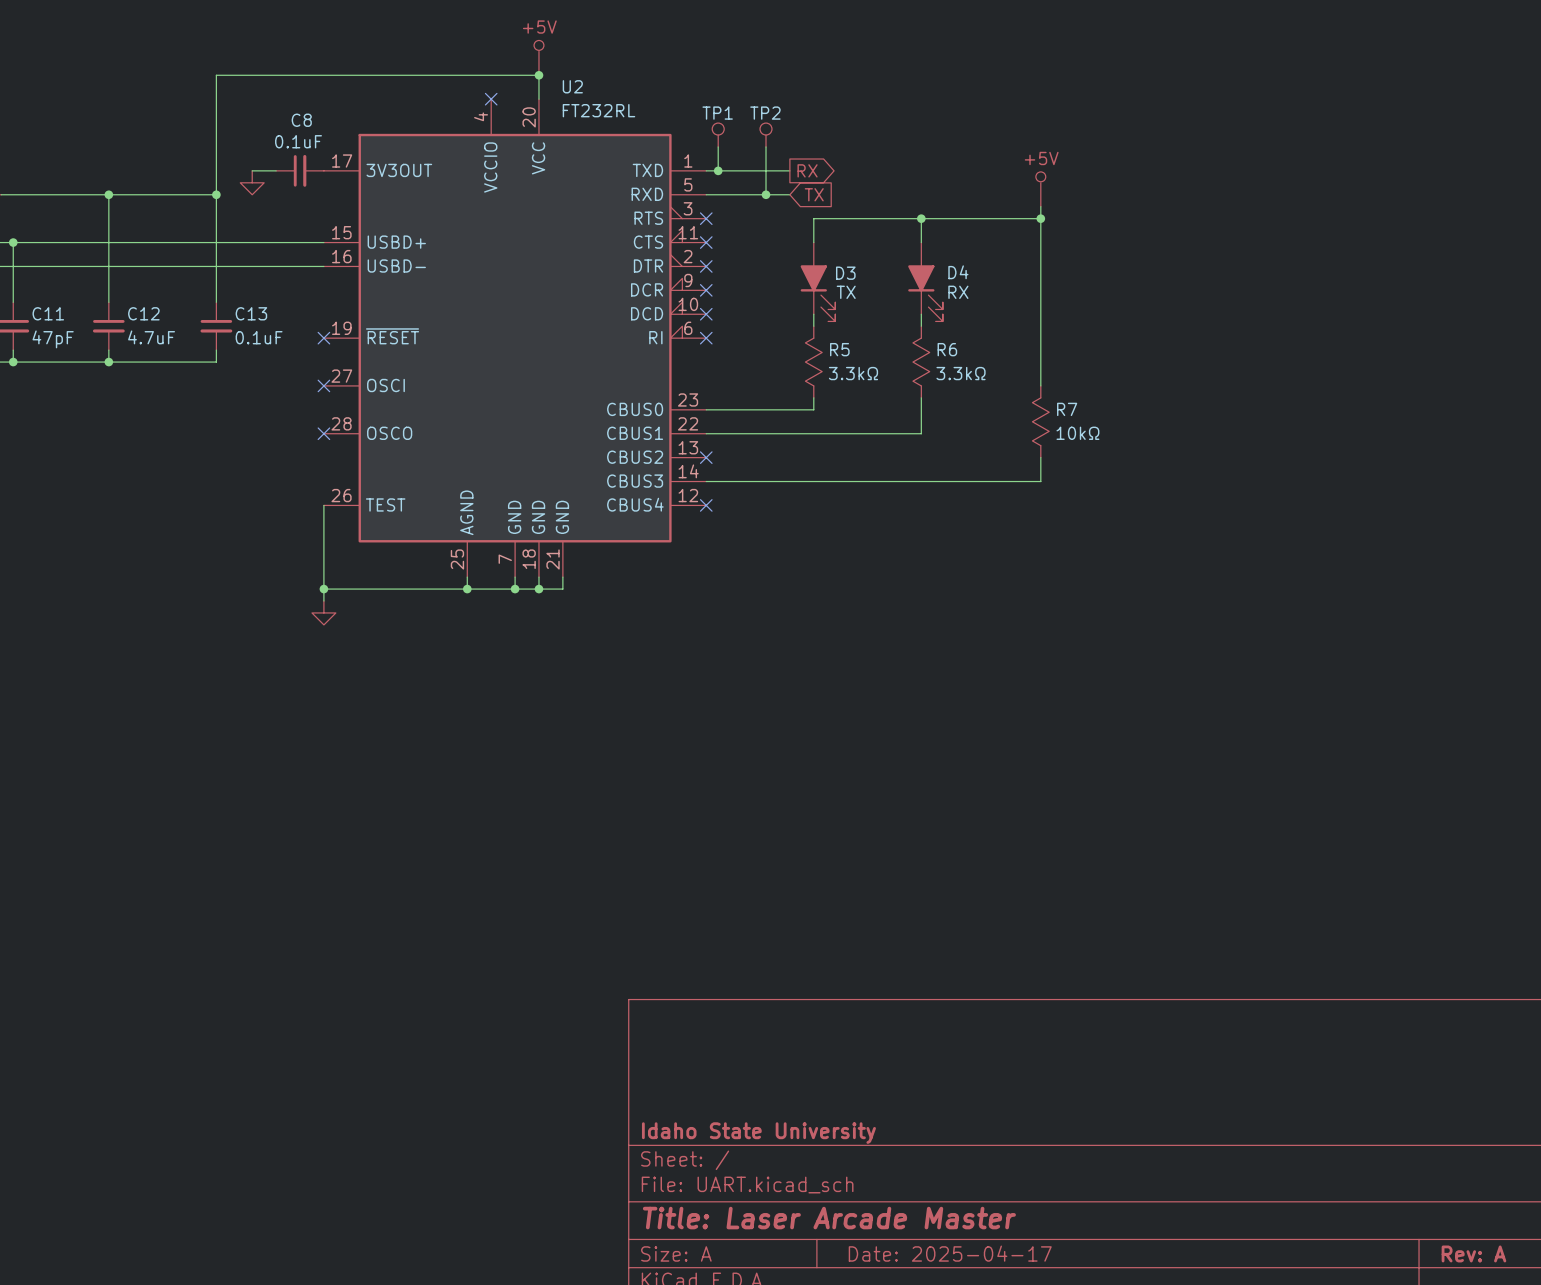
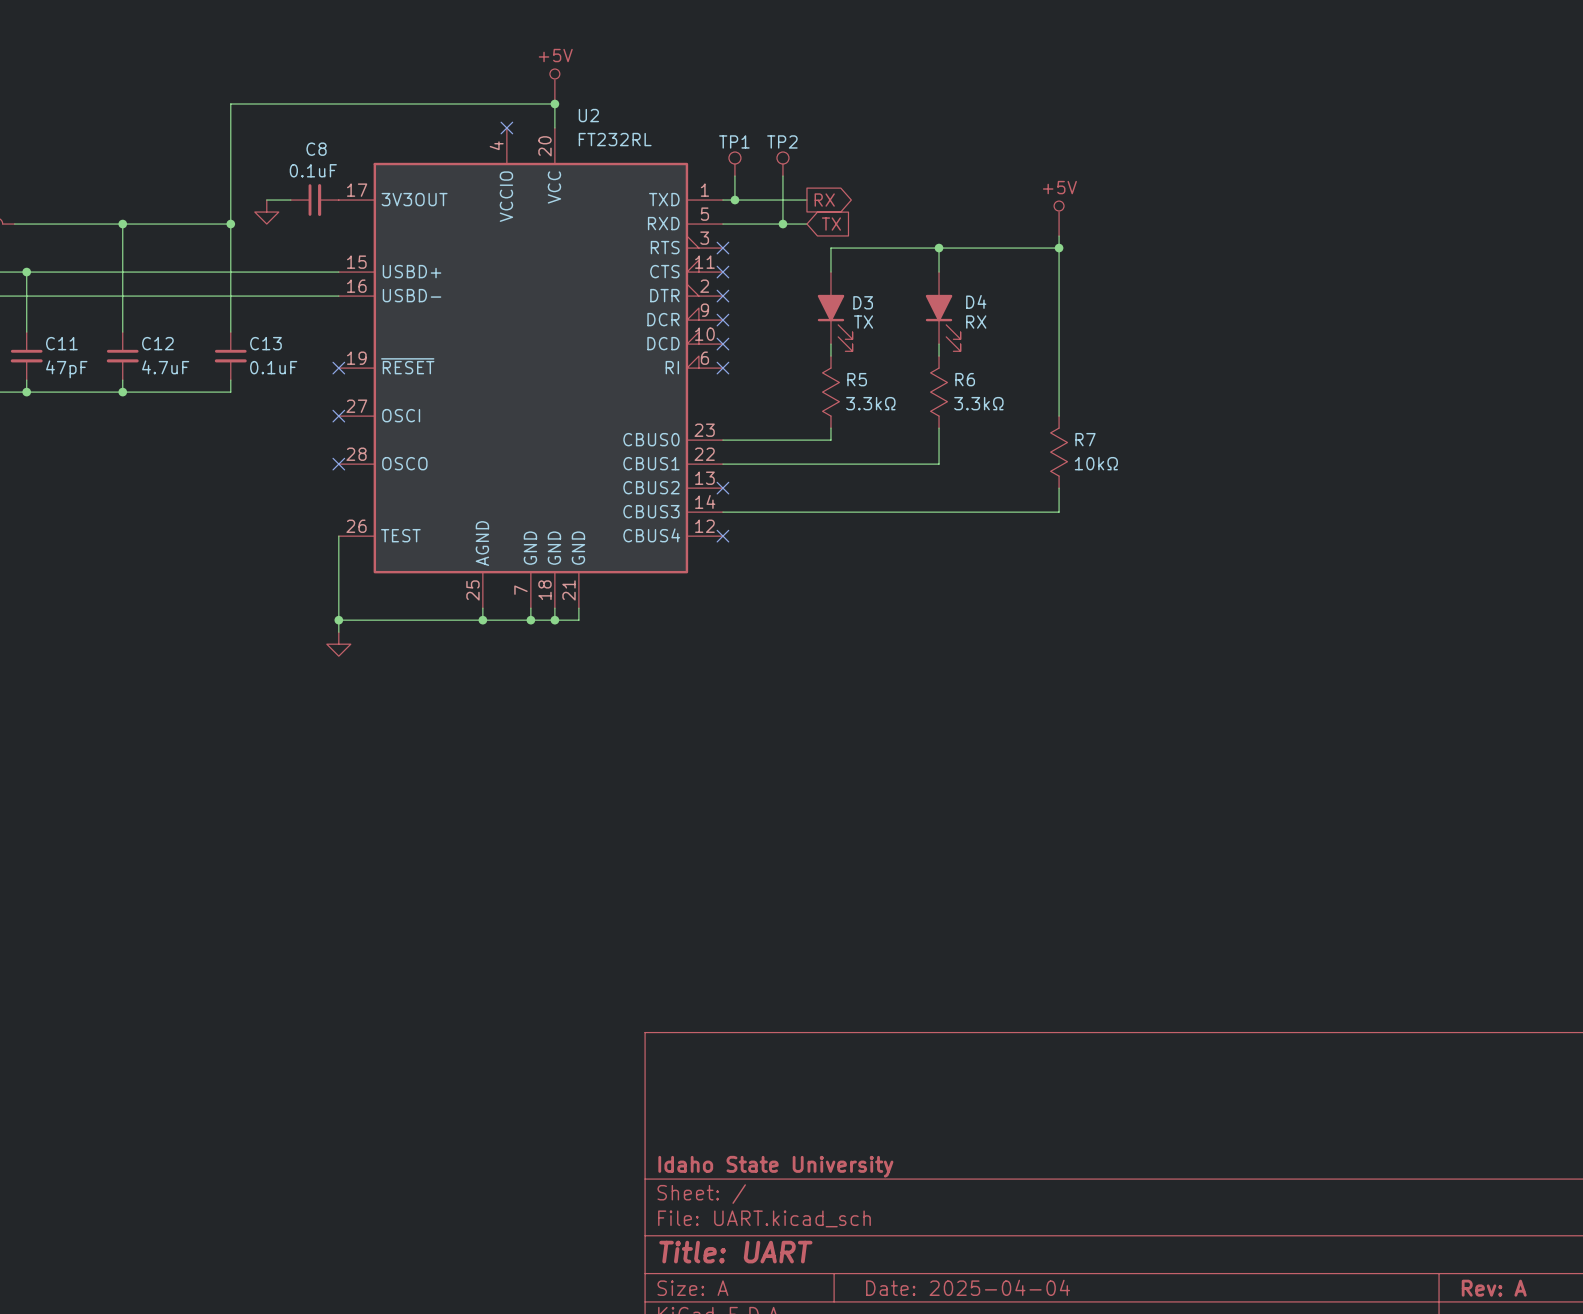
title block: Title: Laser Arcade Master (829, 1218) -> Title: UART (735, 1252)
title block: Date: 2025-04-17 (950, 1253) -> Date: 2025-04-04 (968, 1287)

